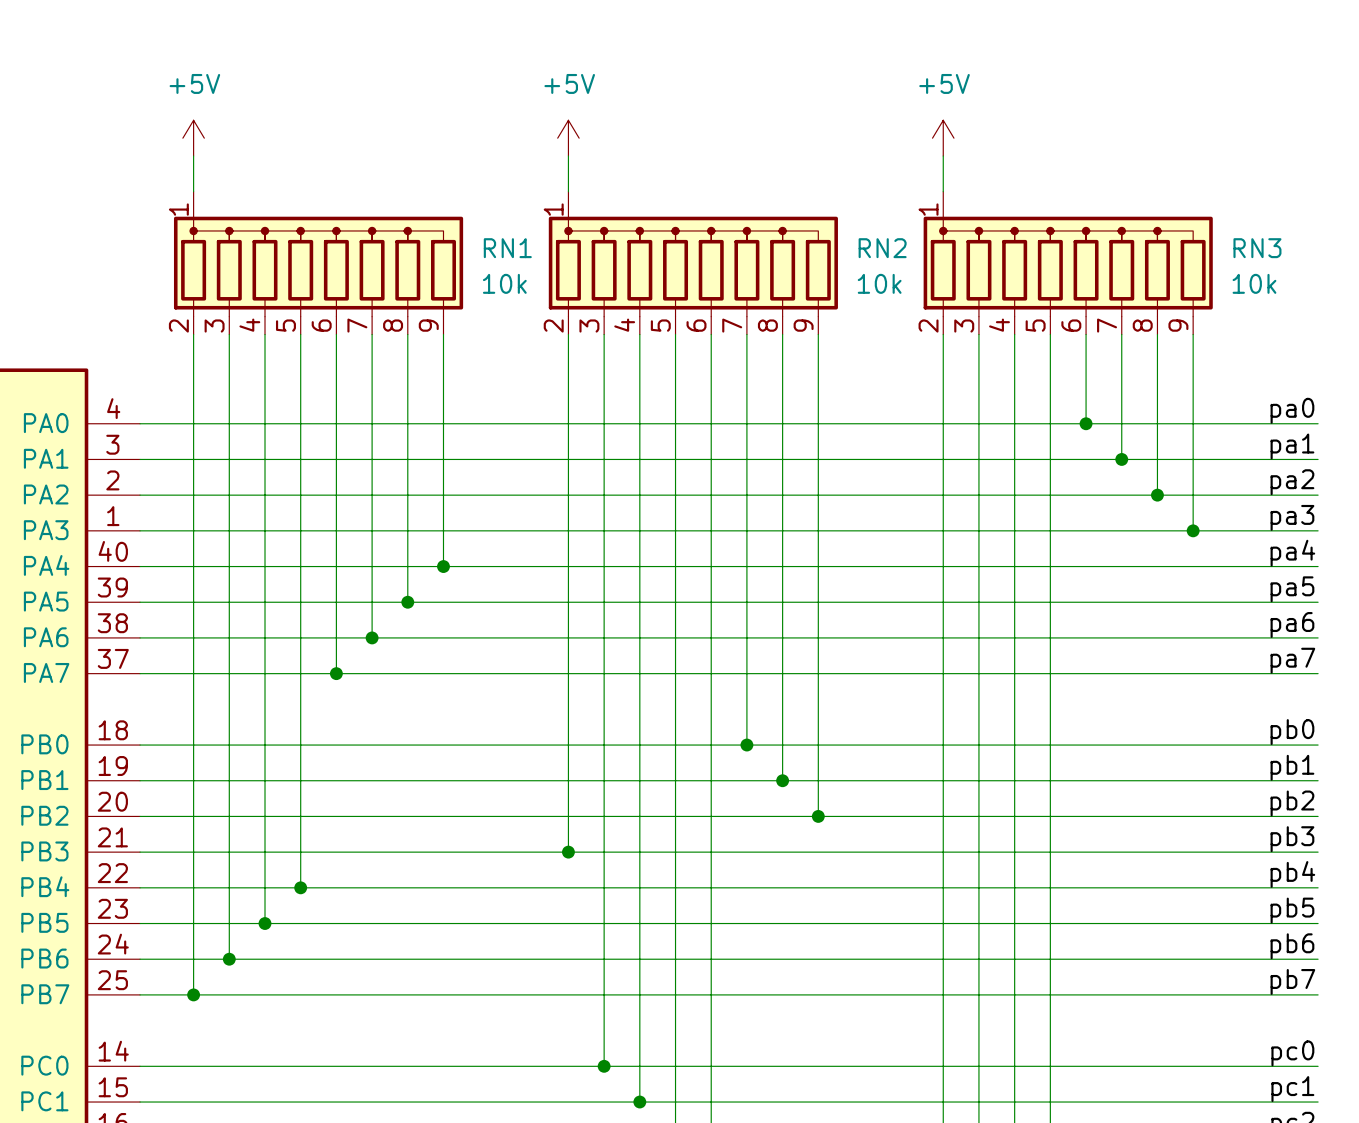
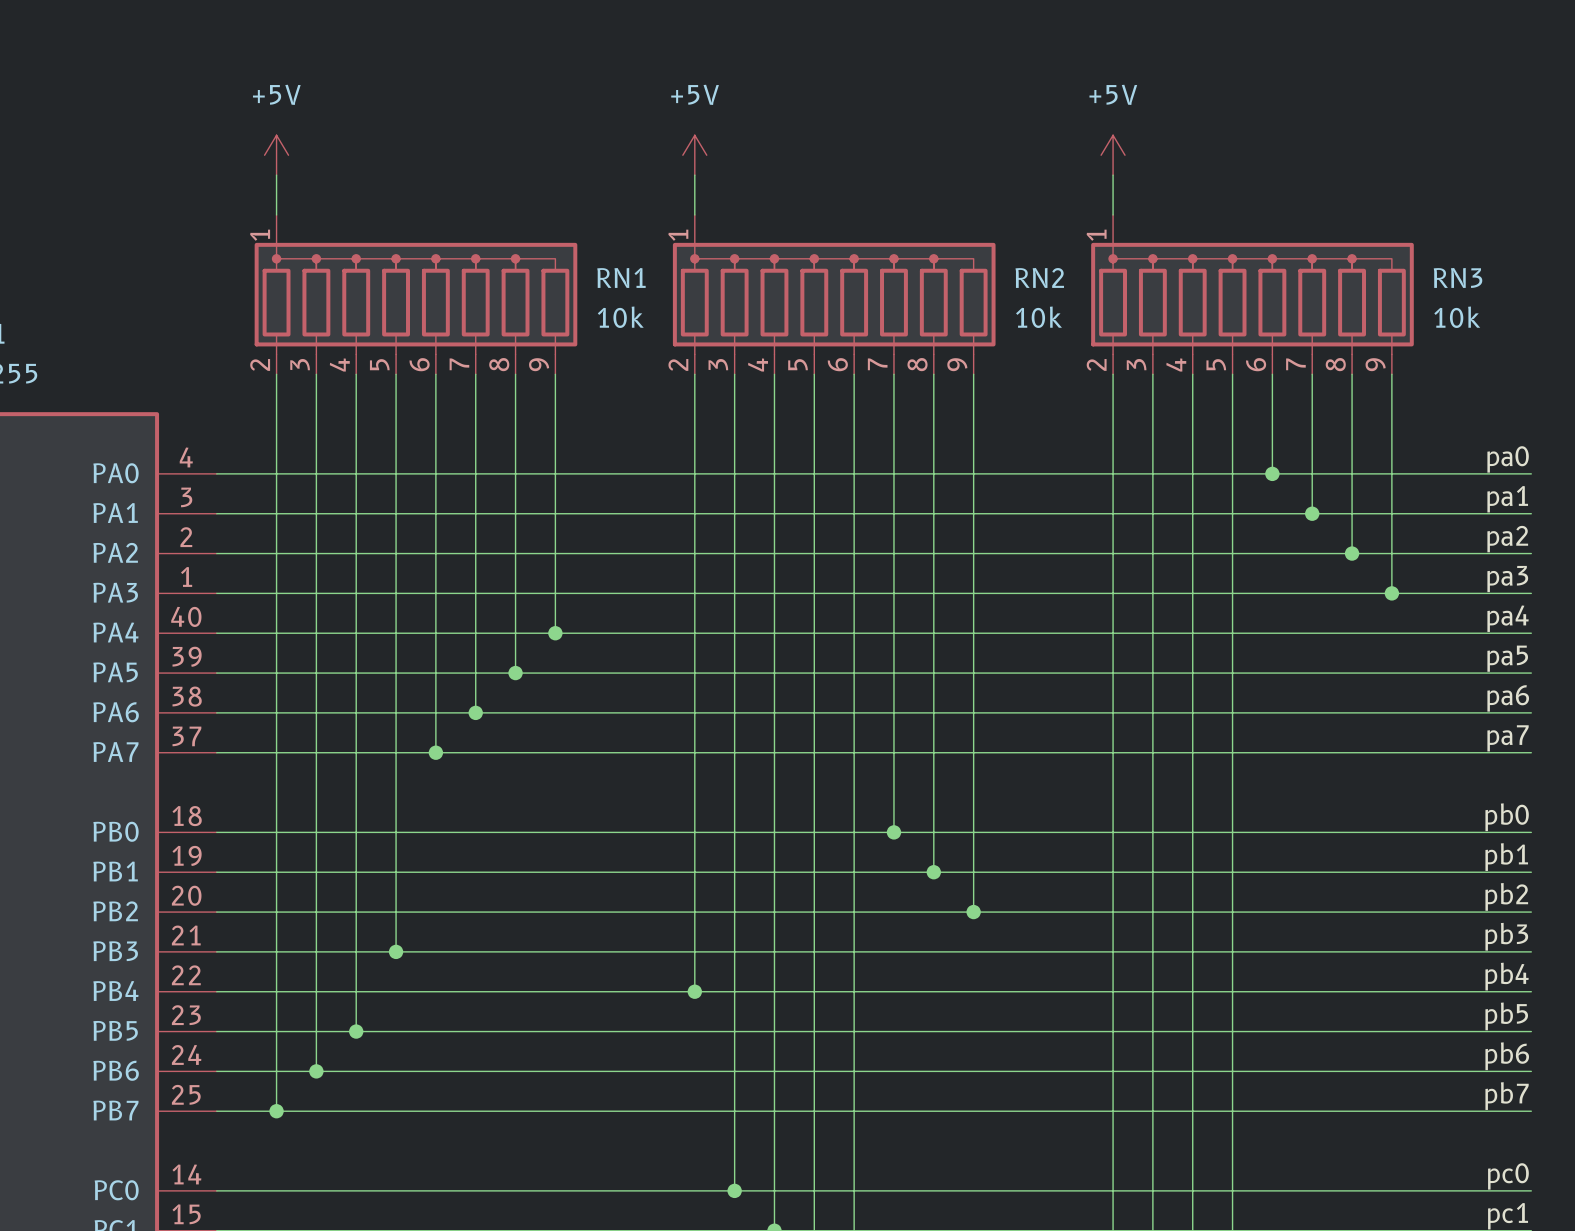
wire: (300, 852) (300, 887) -> (694, 951) (694, 991)
junction position: (568, 852) -> (694, 991)
junction position: (300, 887) -> (396, 951)

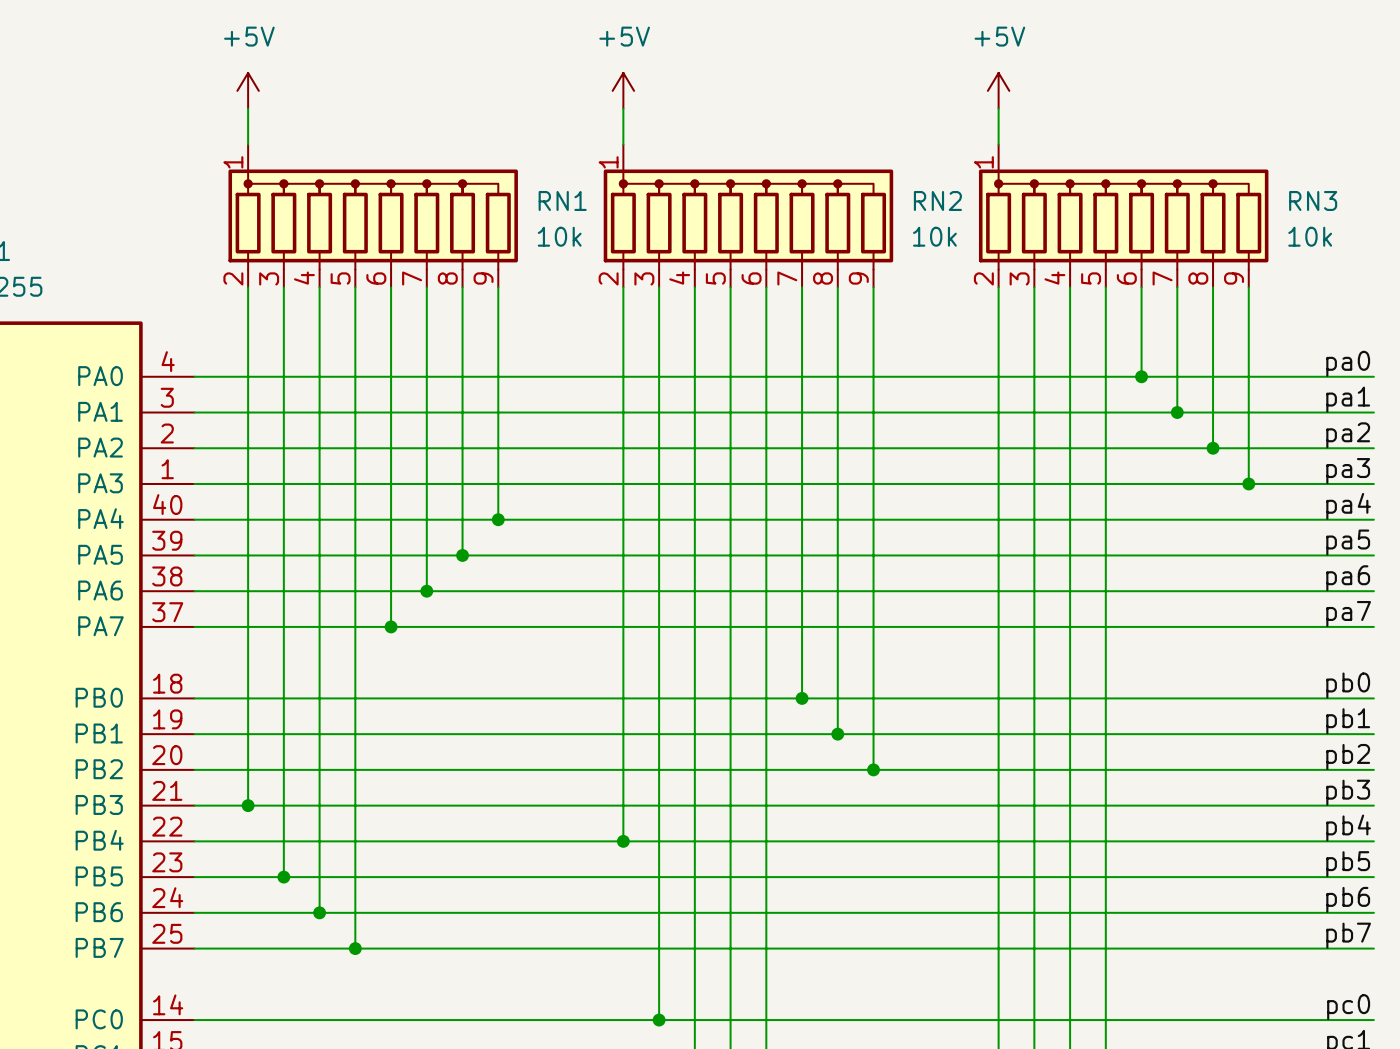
wire: (276, 951) (276, 1111) -> (355, 805) (355, 948)
junction: none -> (248, 805)
junction: (396, 951) -> none
wire: (316, 1031) (316, 1071) -> (319, 877) (319, 912)
junction: none -> (283, 877)
junction: (356, 1031) -> none
junction: (316, 1071) -> none
junction: none -> (319, 912)
junction: (276, 1111) -> none
junction: none -> (355, 948)

